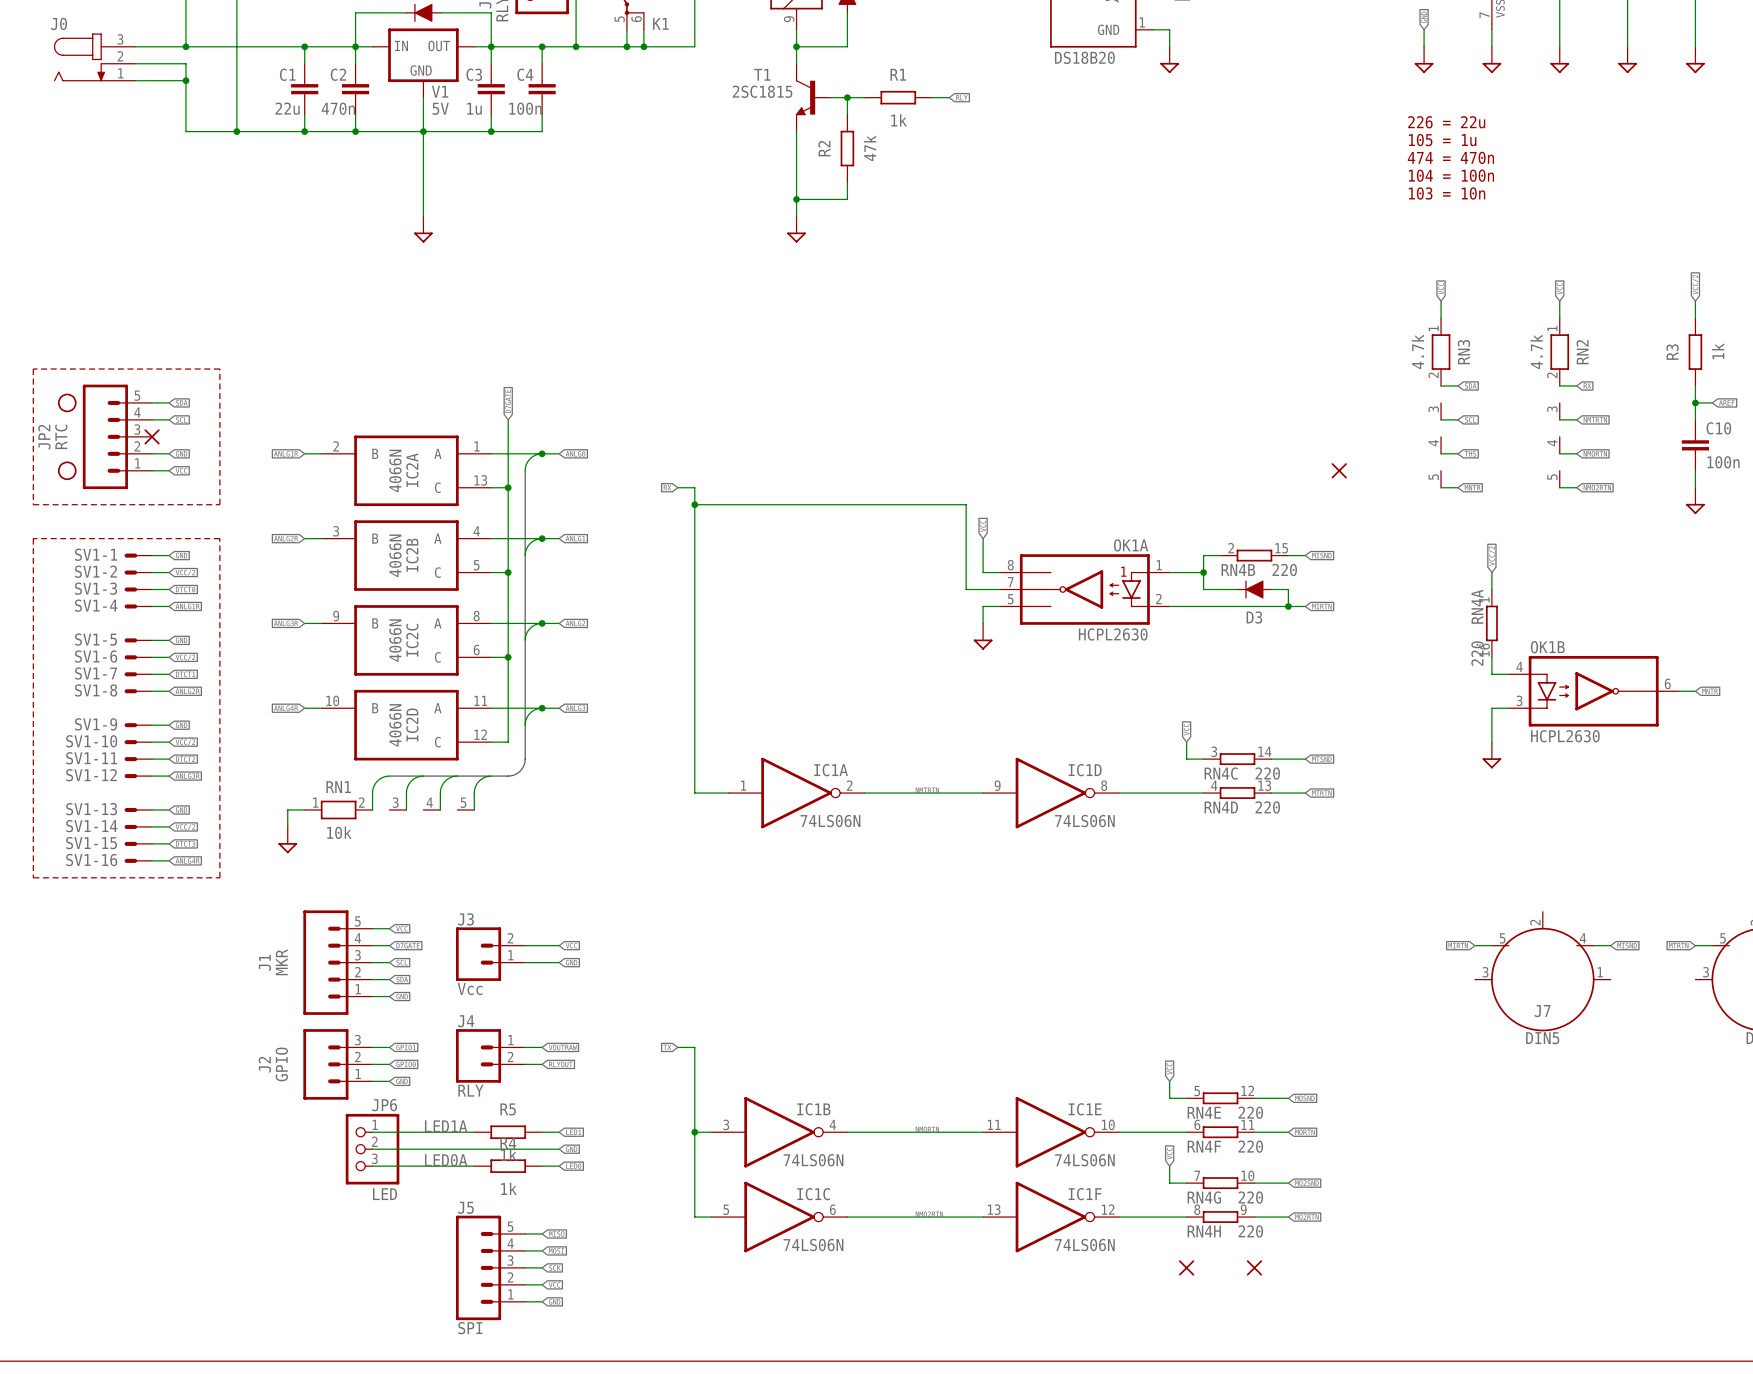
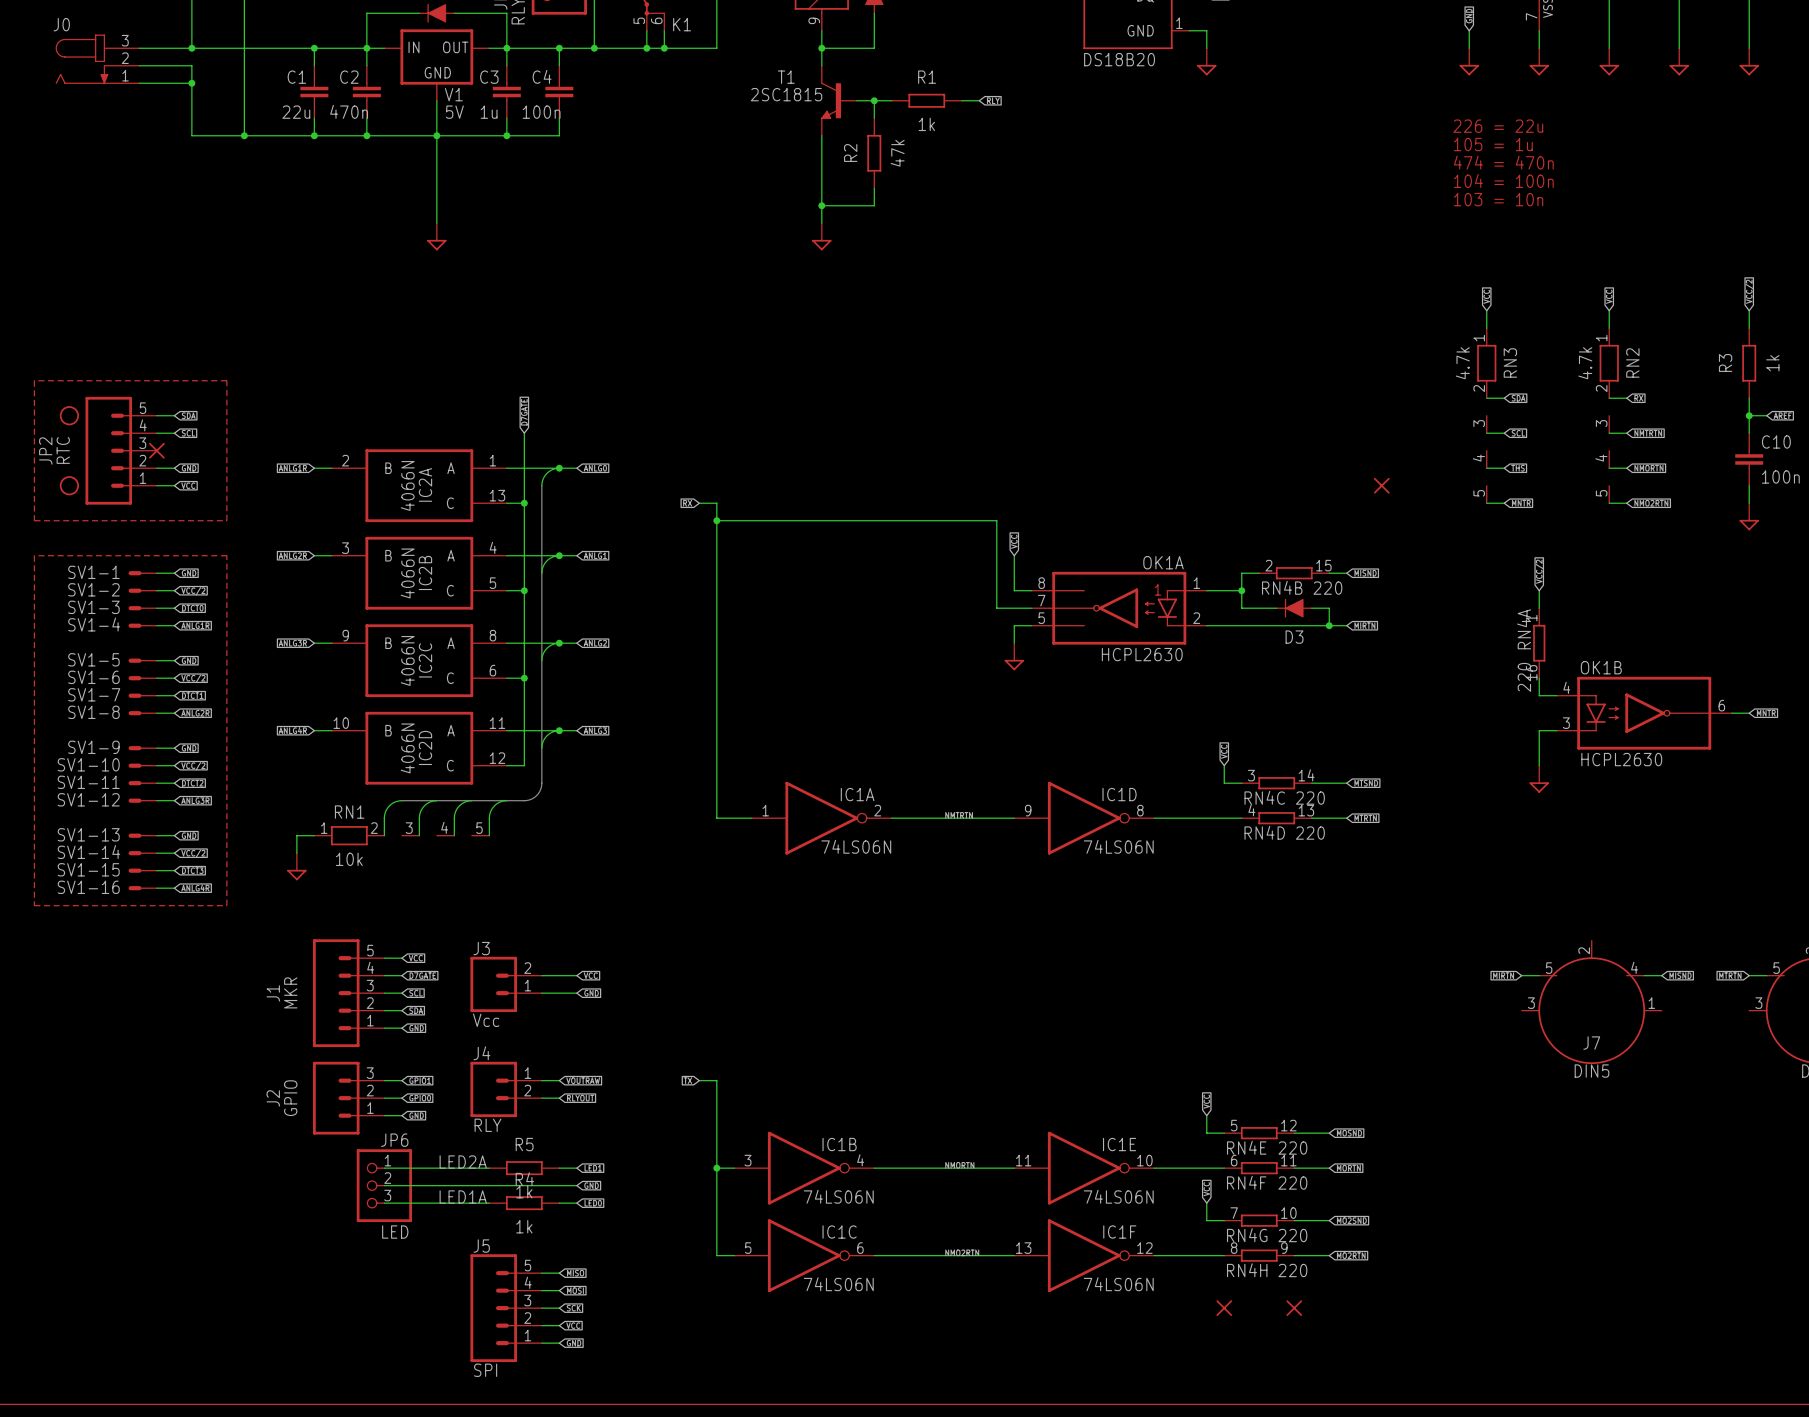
label: LED1A (446, 1126) -> LED2A (463, 1162)
label: LED0A (446, 1160) -> LED1A (463, 1197)

